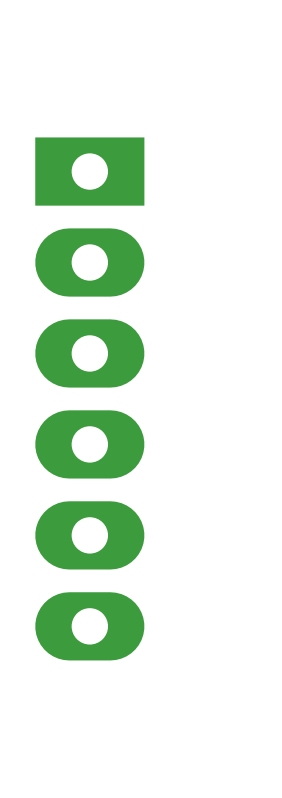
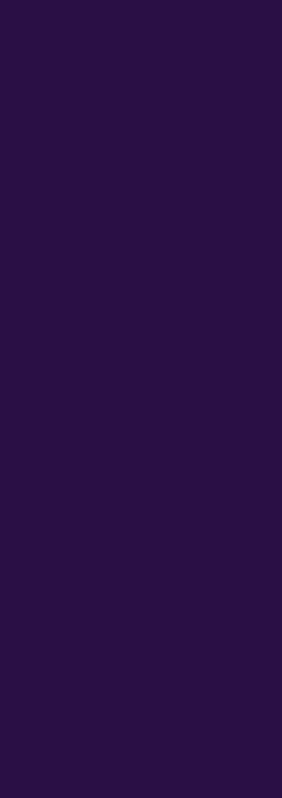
part: (89, 398) -> none

